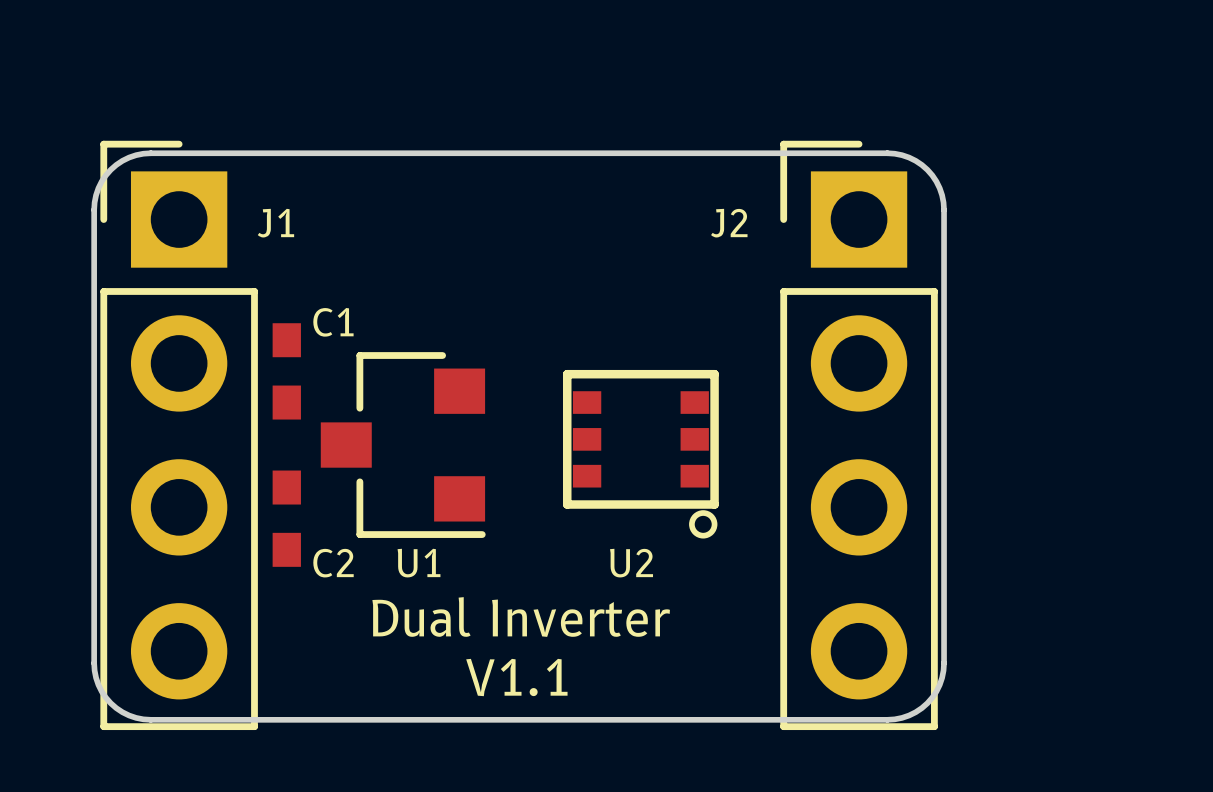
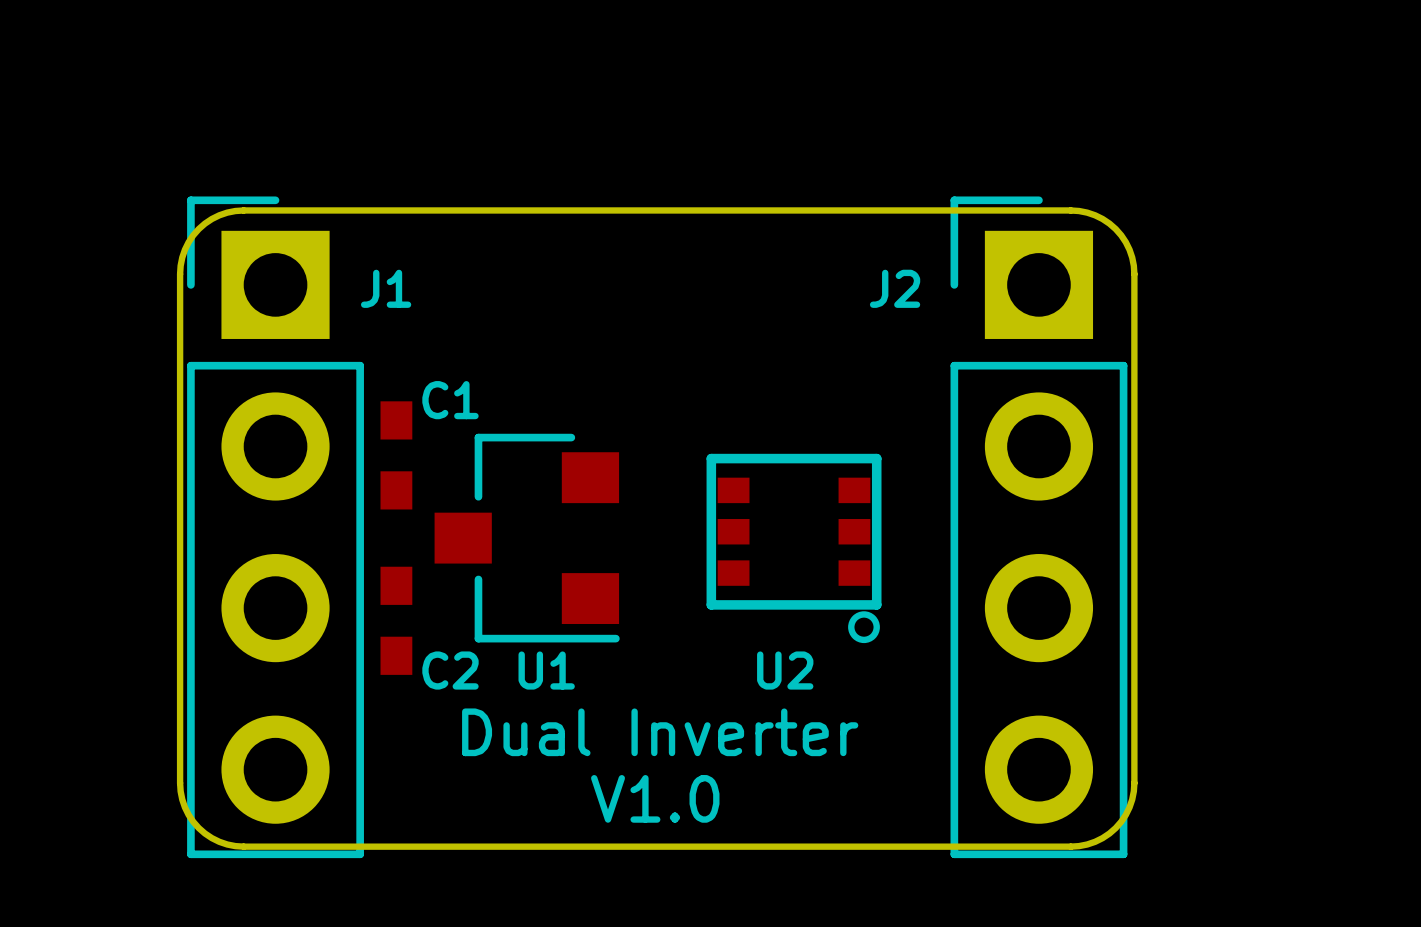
text: V1.1 (516, 677) -> V1.0 (655, 798)

